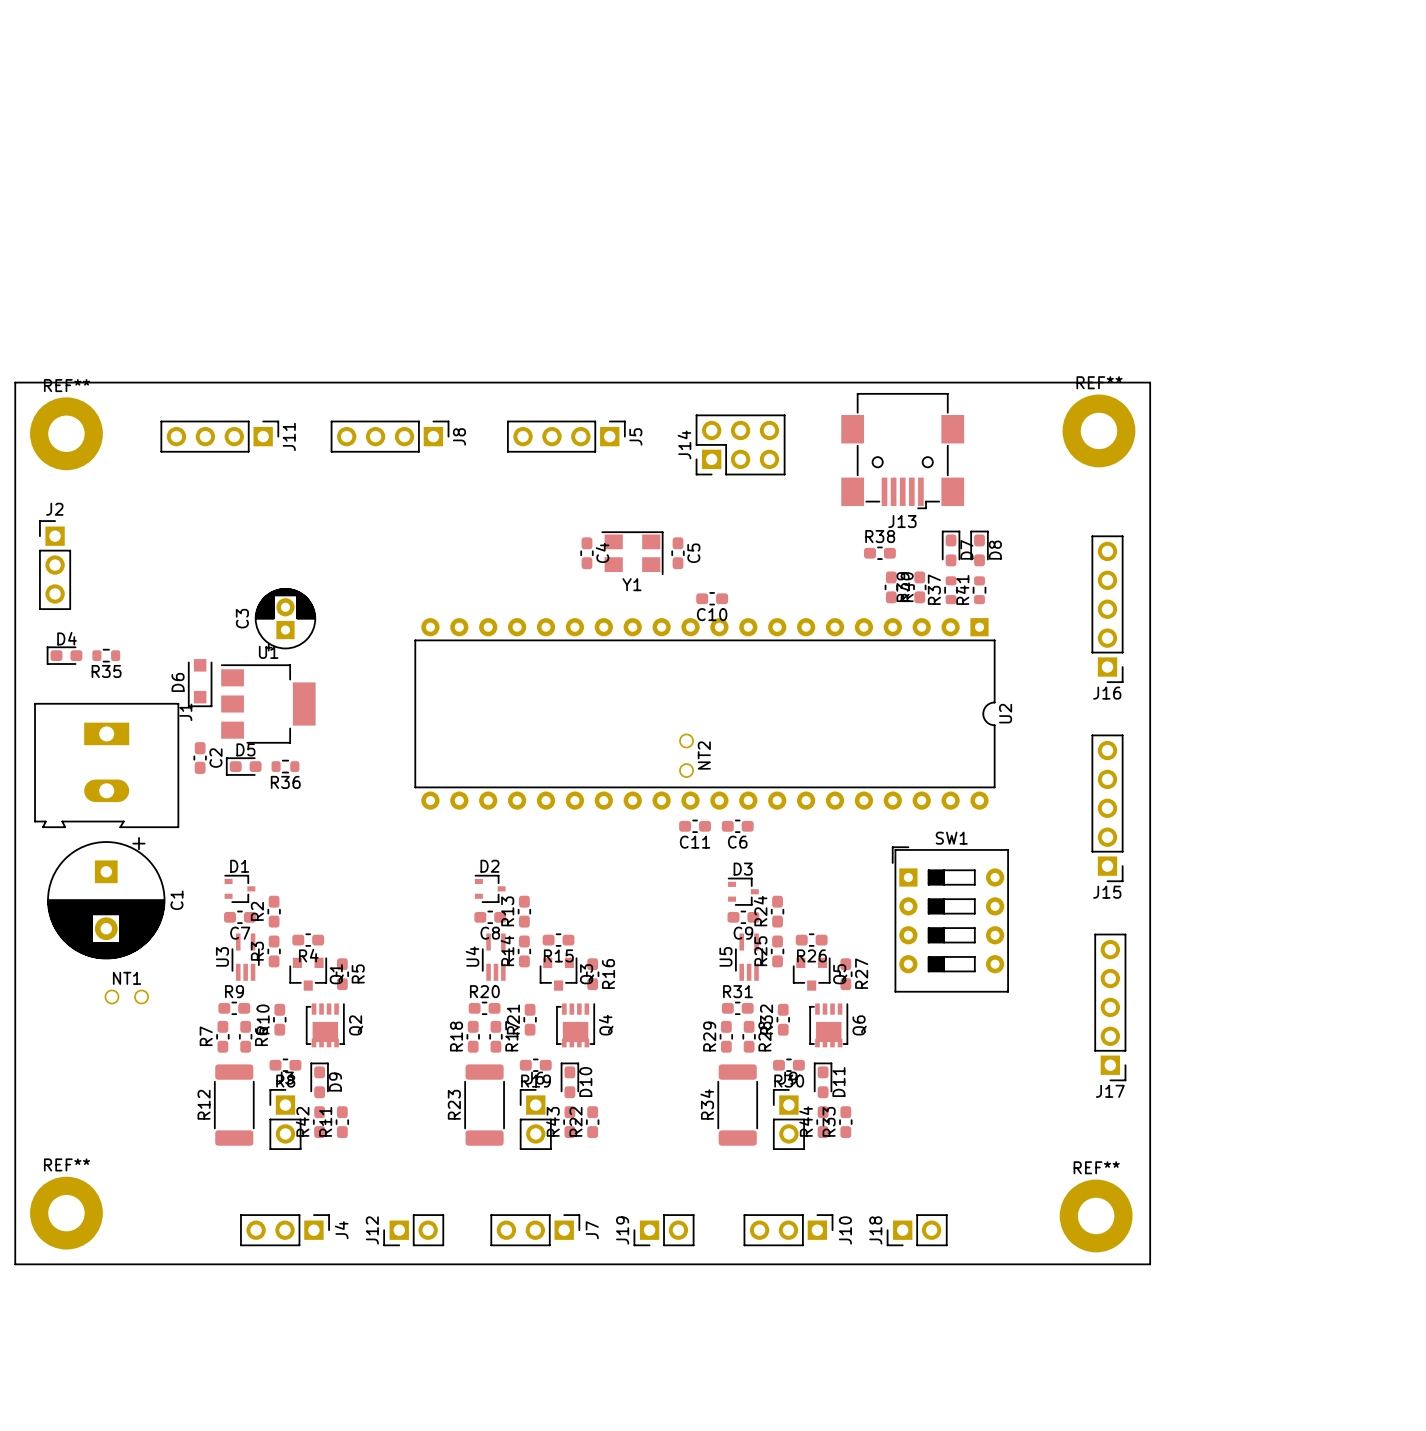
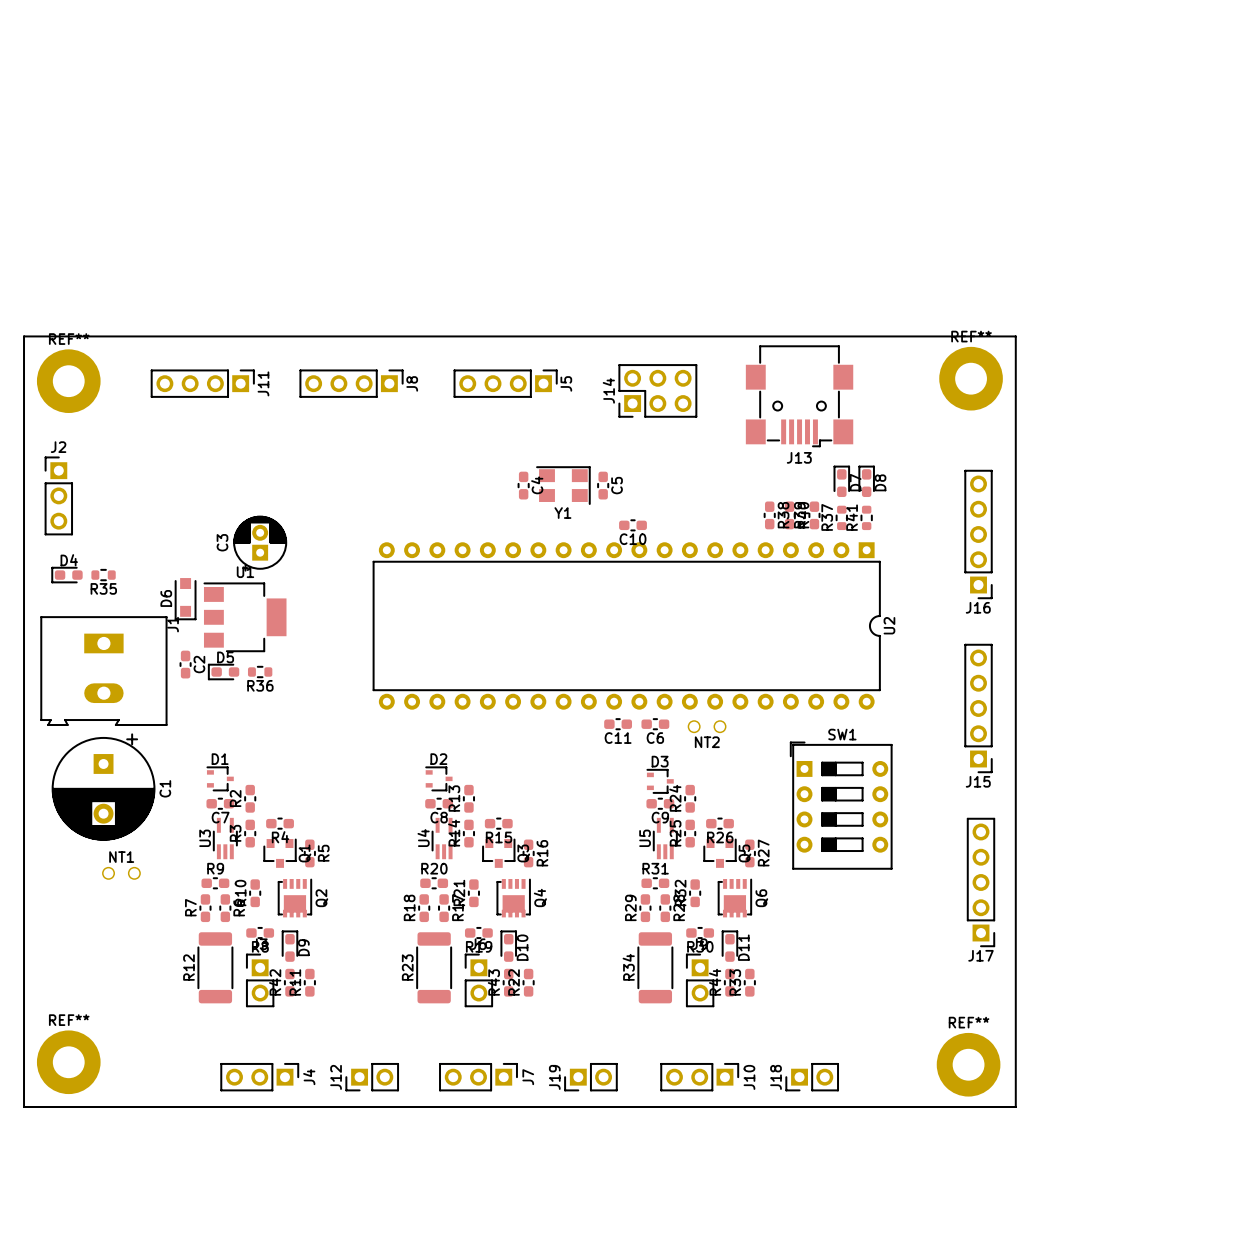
R38 rotation: 0° (879, 553) -> 90° clockwise (769, 515)
R38 position: (879, 553) -> (769, 515)
NT2 rotation: 0° (686, 755) -> 90° clockwise (707, 726)
NT2 position: (686, 755) -> (707, 726)

